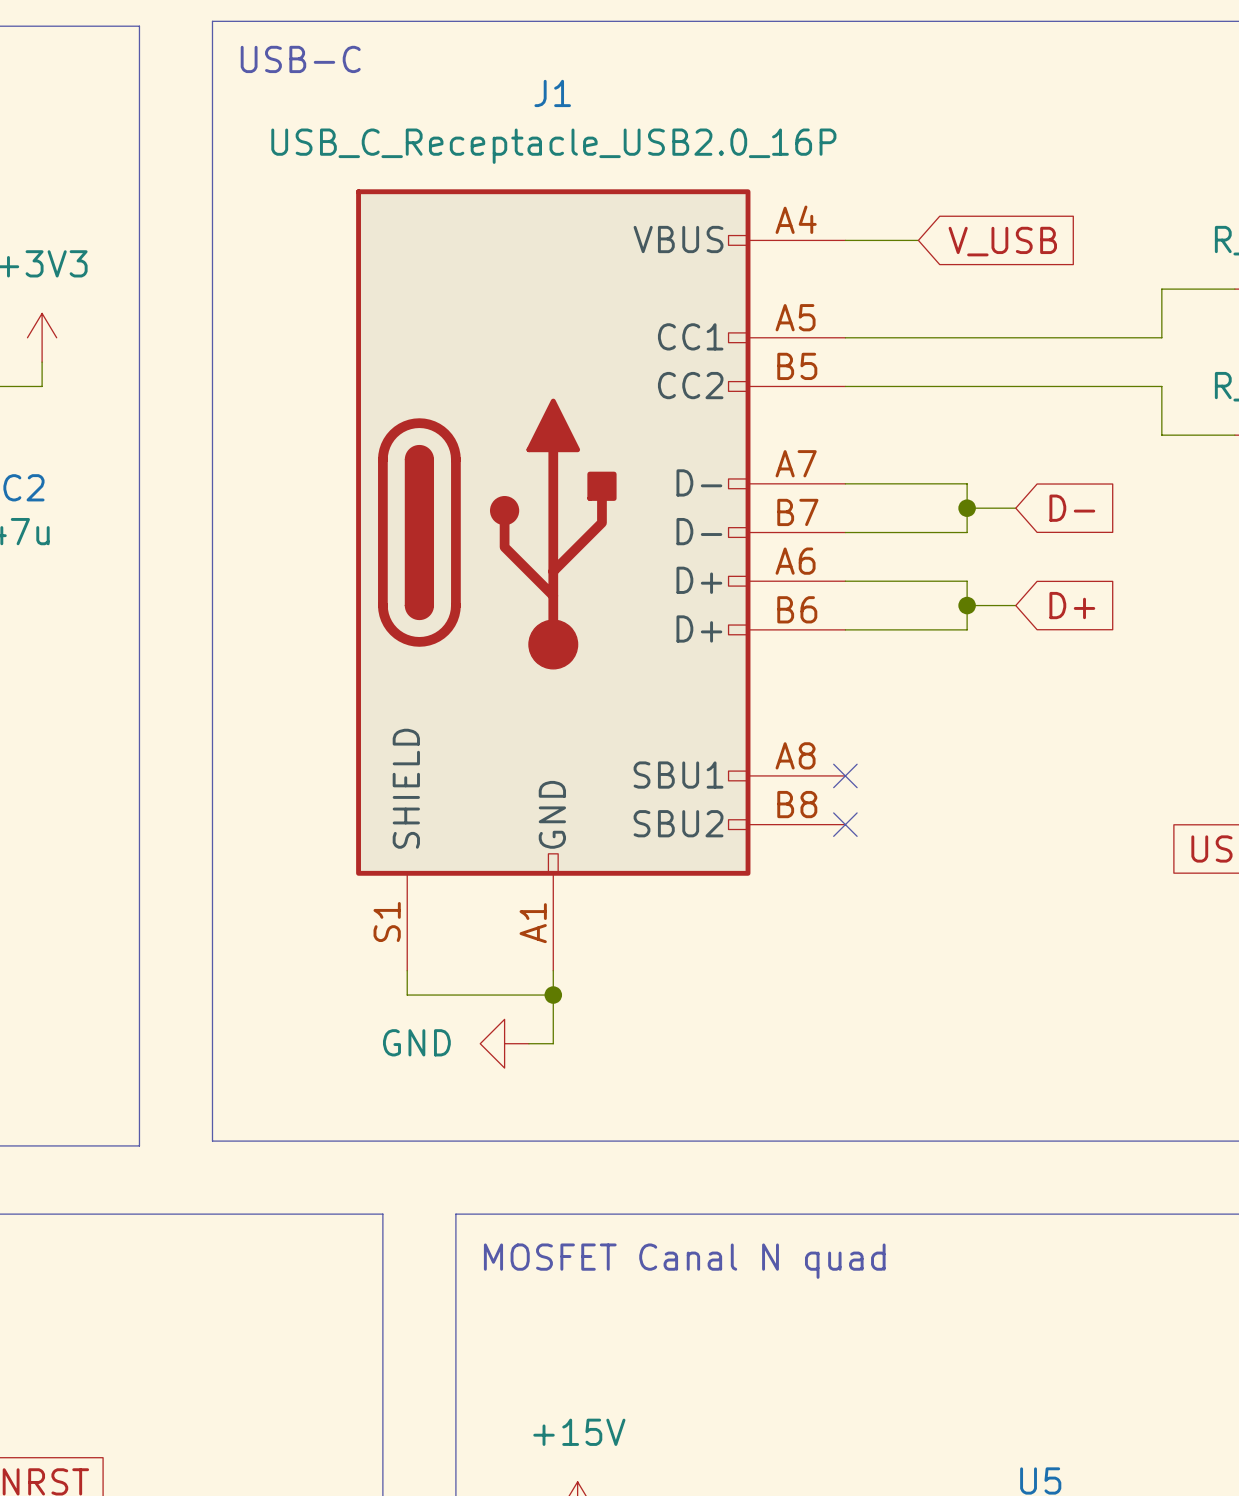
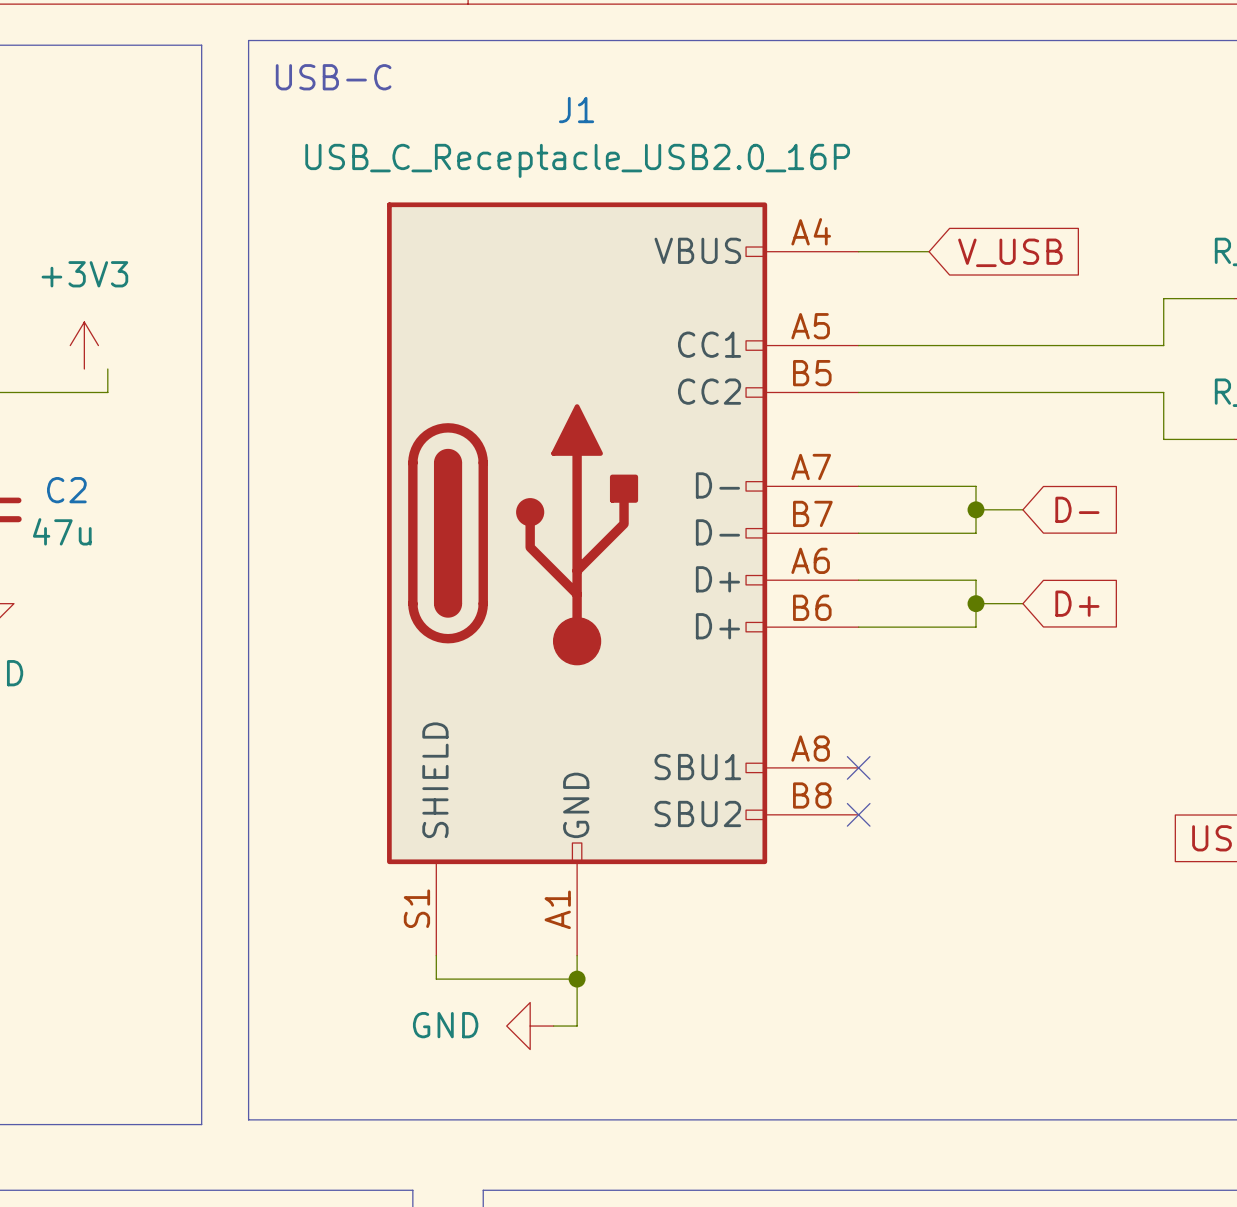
line: (139, 26) (139, 1145) -> (178, 45) (201, 45) (201, 1124) (178, 1124)
wire: (42, 362) (42, 386) -> (107, 369) (107, 392) (84, 392)

